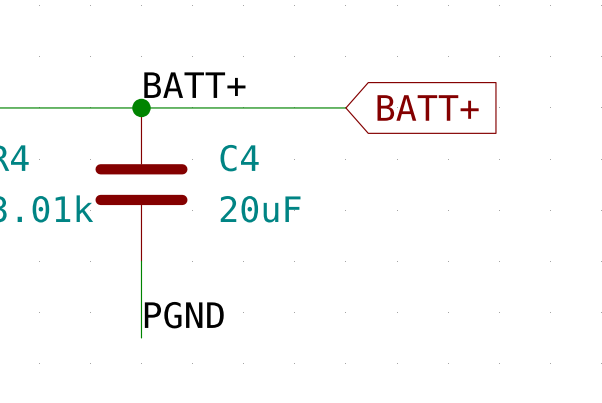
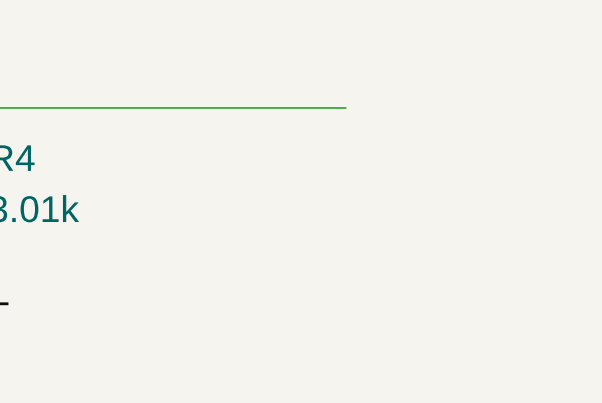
label: BATT+ (194, 85) -> none
junction: (141, 107) -> none
global label: BATT+ (428, 107) -> none
C4: 20uF (141, 184) -> none
wire: (141, 261) (141, 337) -> none
label: PGND (184, 315) -> none

